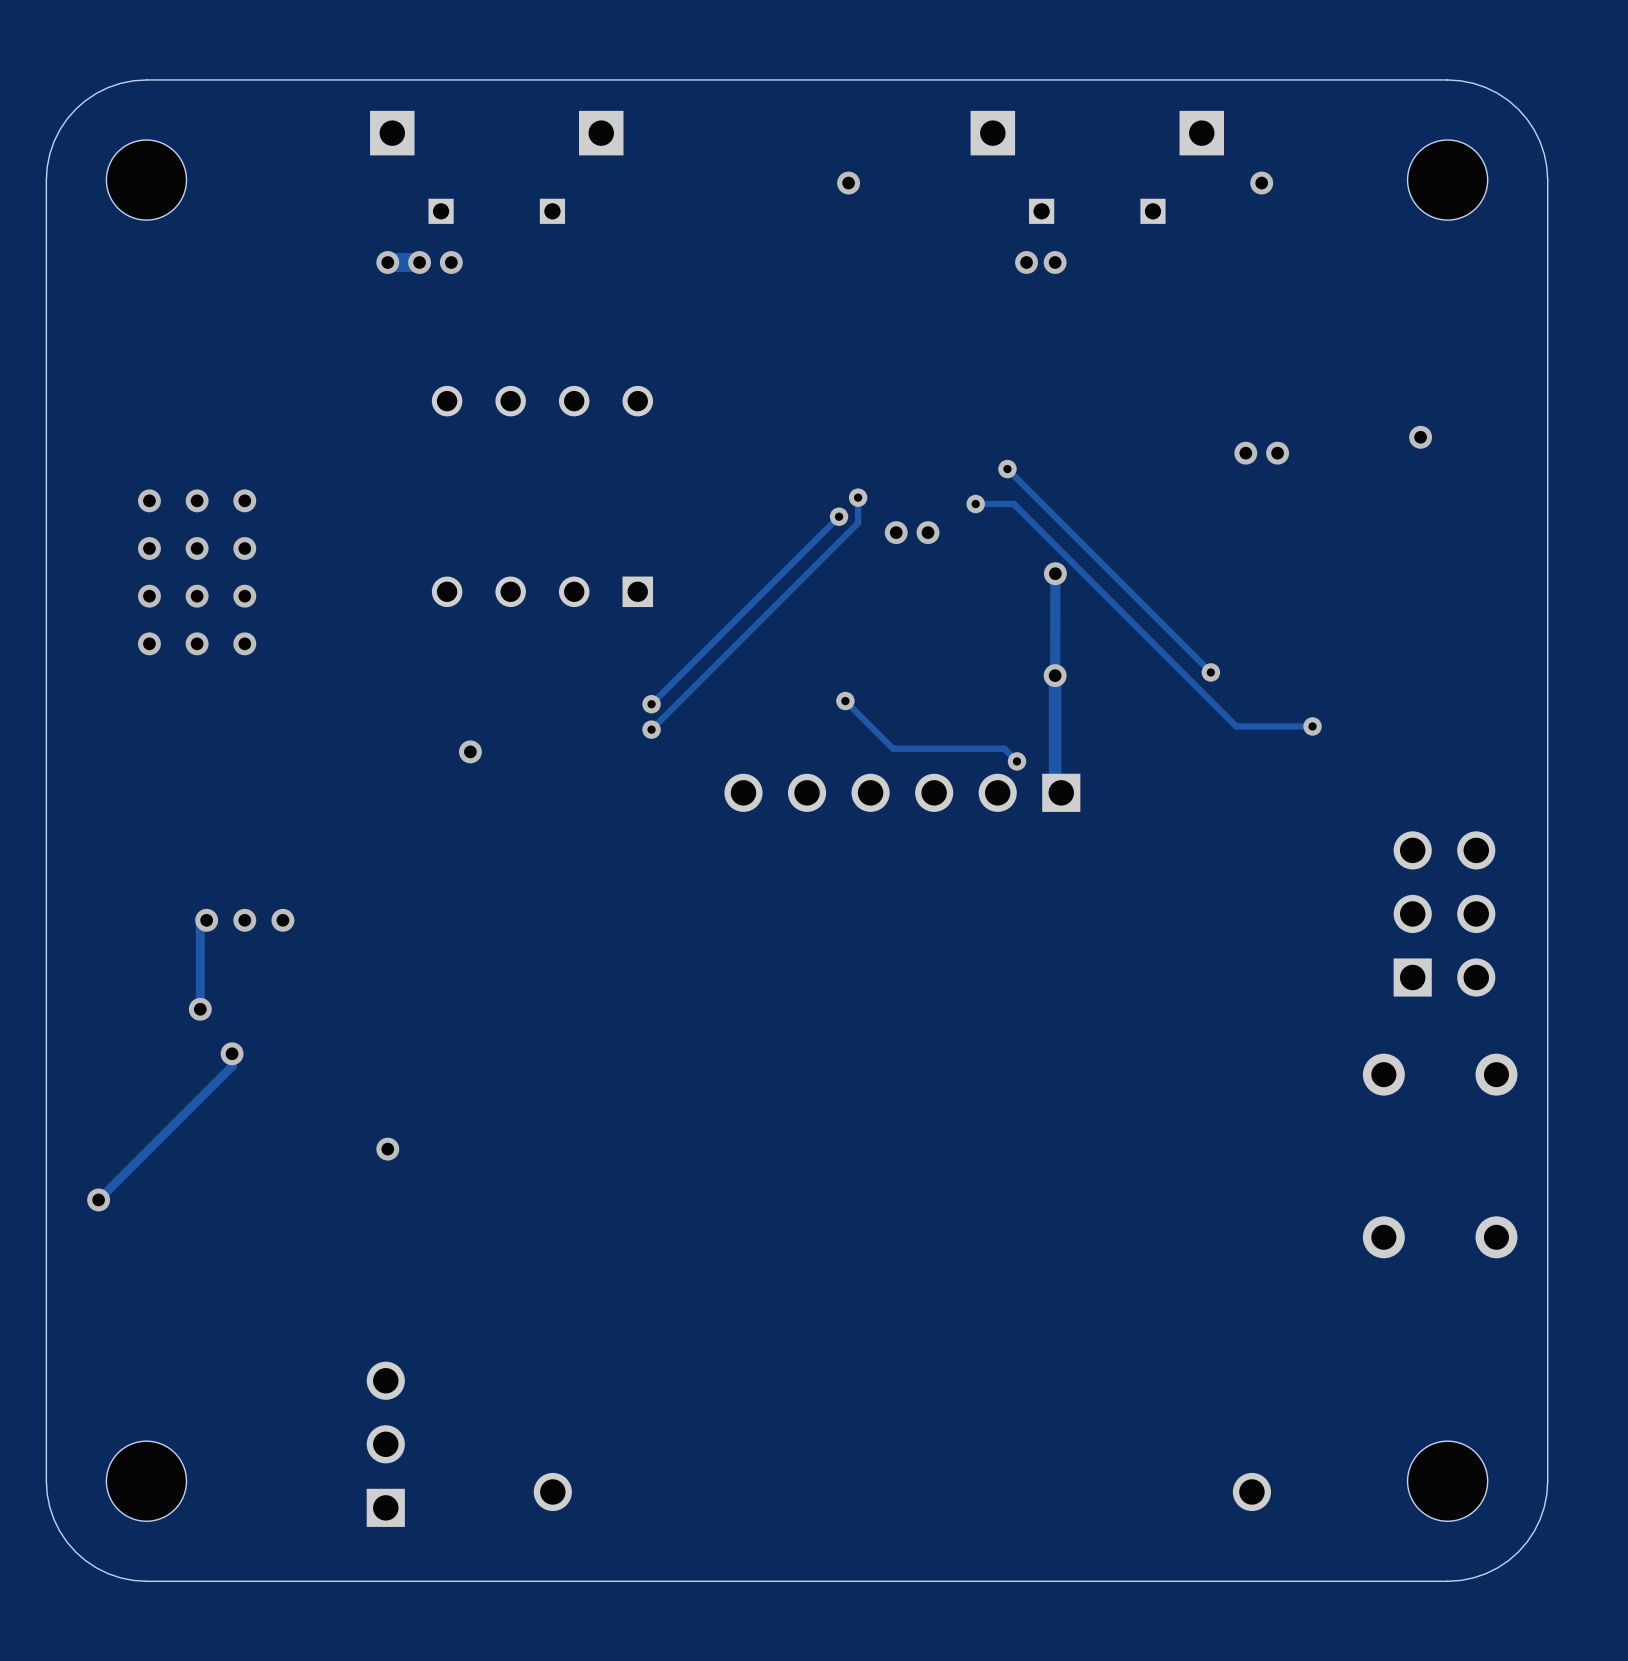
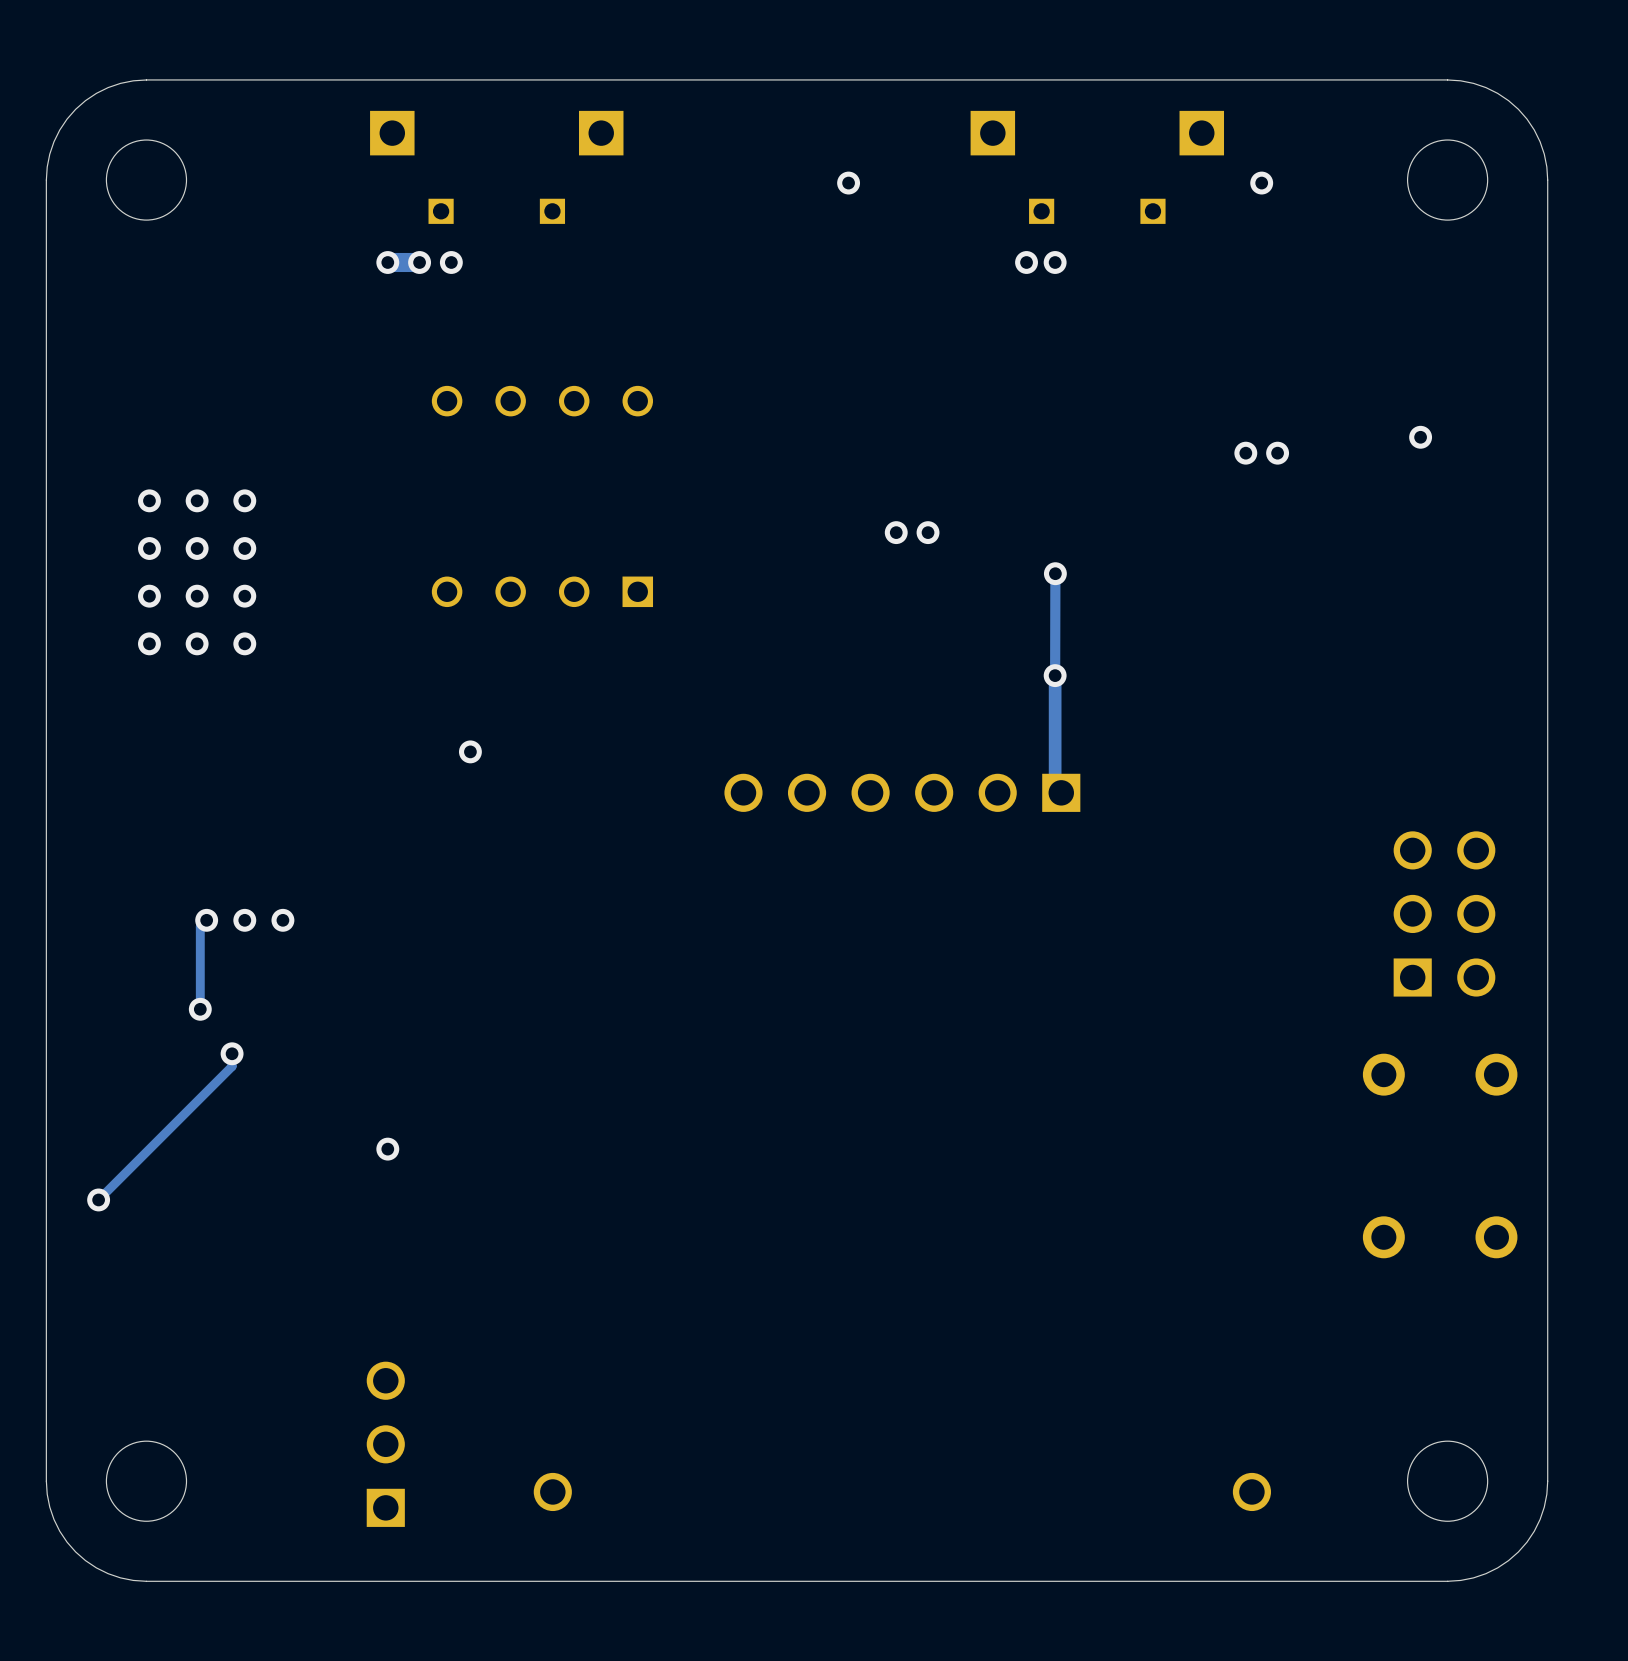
track: (1007, 469) (1210, 672) -> none
via: (1007, 469) -> none
track: (858, 497) (858, 523) (651, 729) -> none
via: (858, 497) -> none
track: (975, 504) (1013, 504) (1236, 726) (1312, 726) -> none
via: (975, 504) -> none
track: (839, 516) (651, 704) -> none
via: (839, 516) -> none
via: (1210, 672) -> none
track: (845, 701) (893, 748) (1004, 748) (1017, 761) -> none
via: (845, 701) -> none
via: (651, 704) -> none
via: (1312, 726) -> none
via: (651, 729) -> none
via: (1017, 761) -> none

